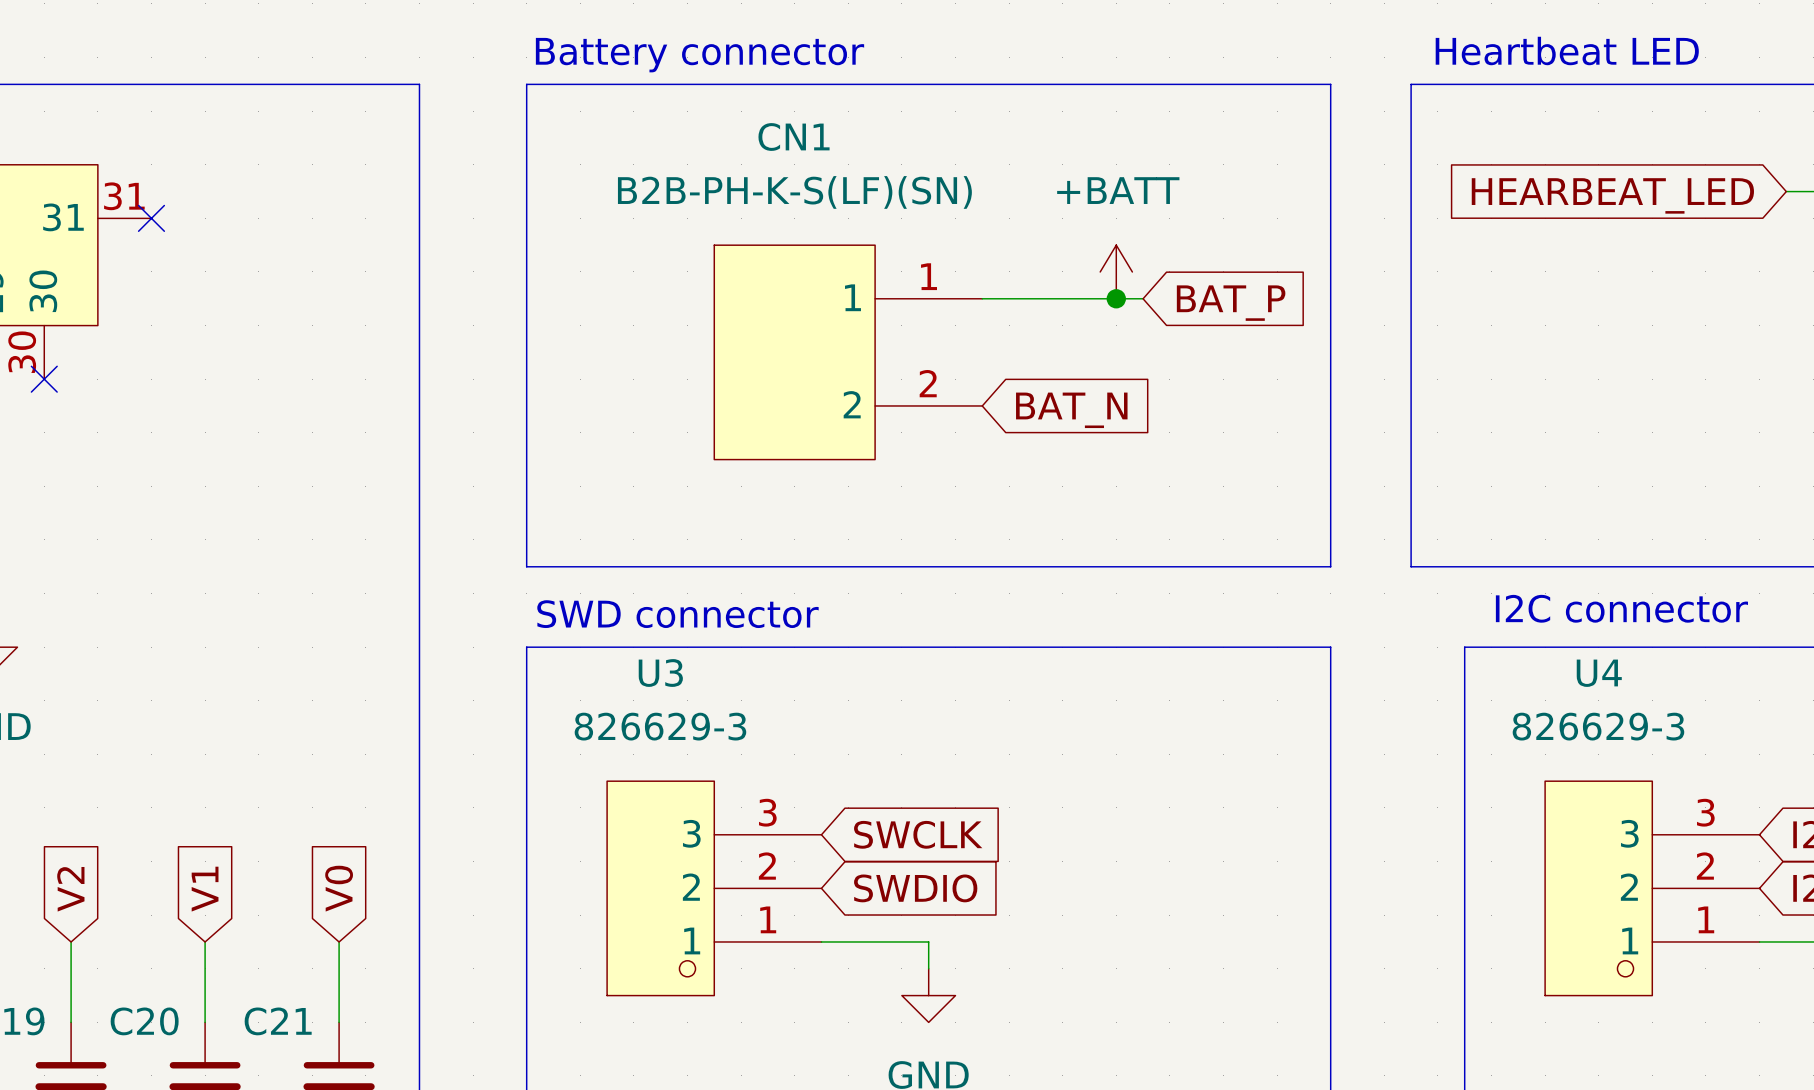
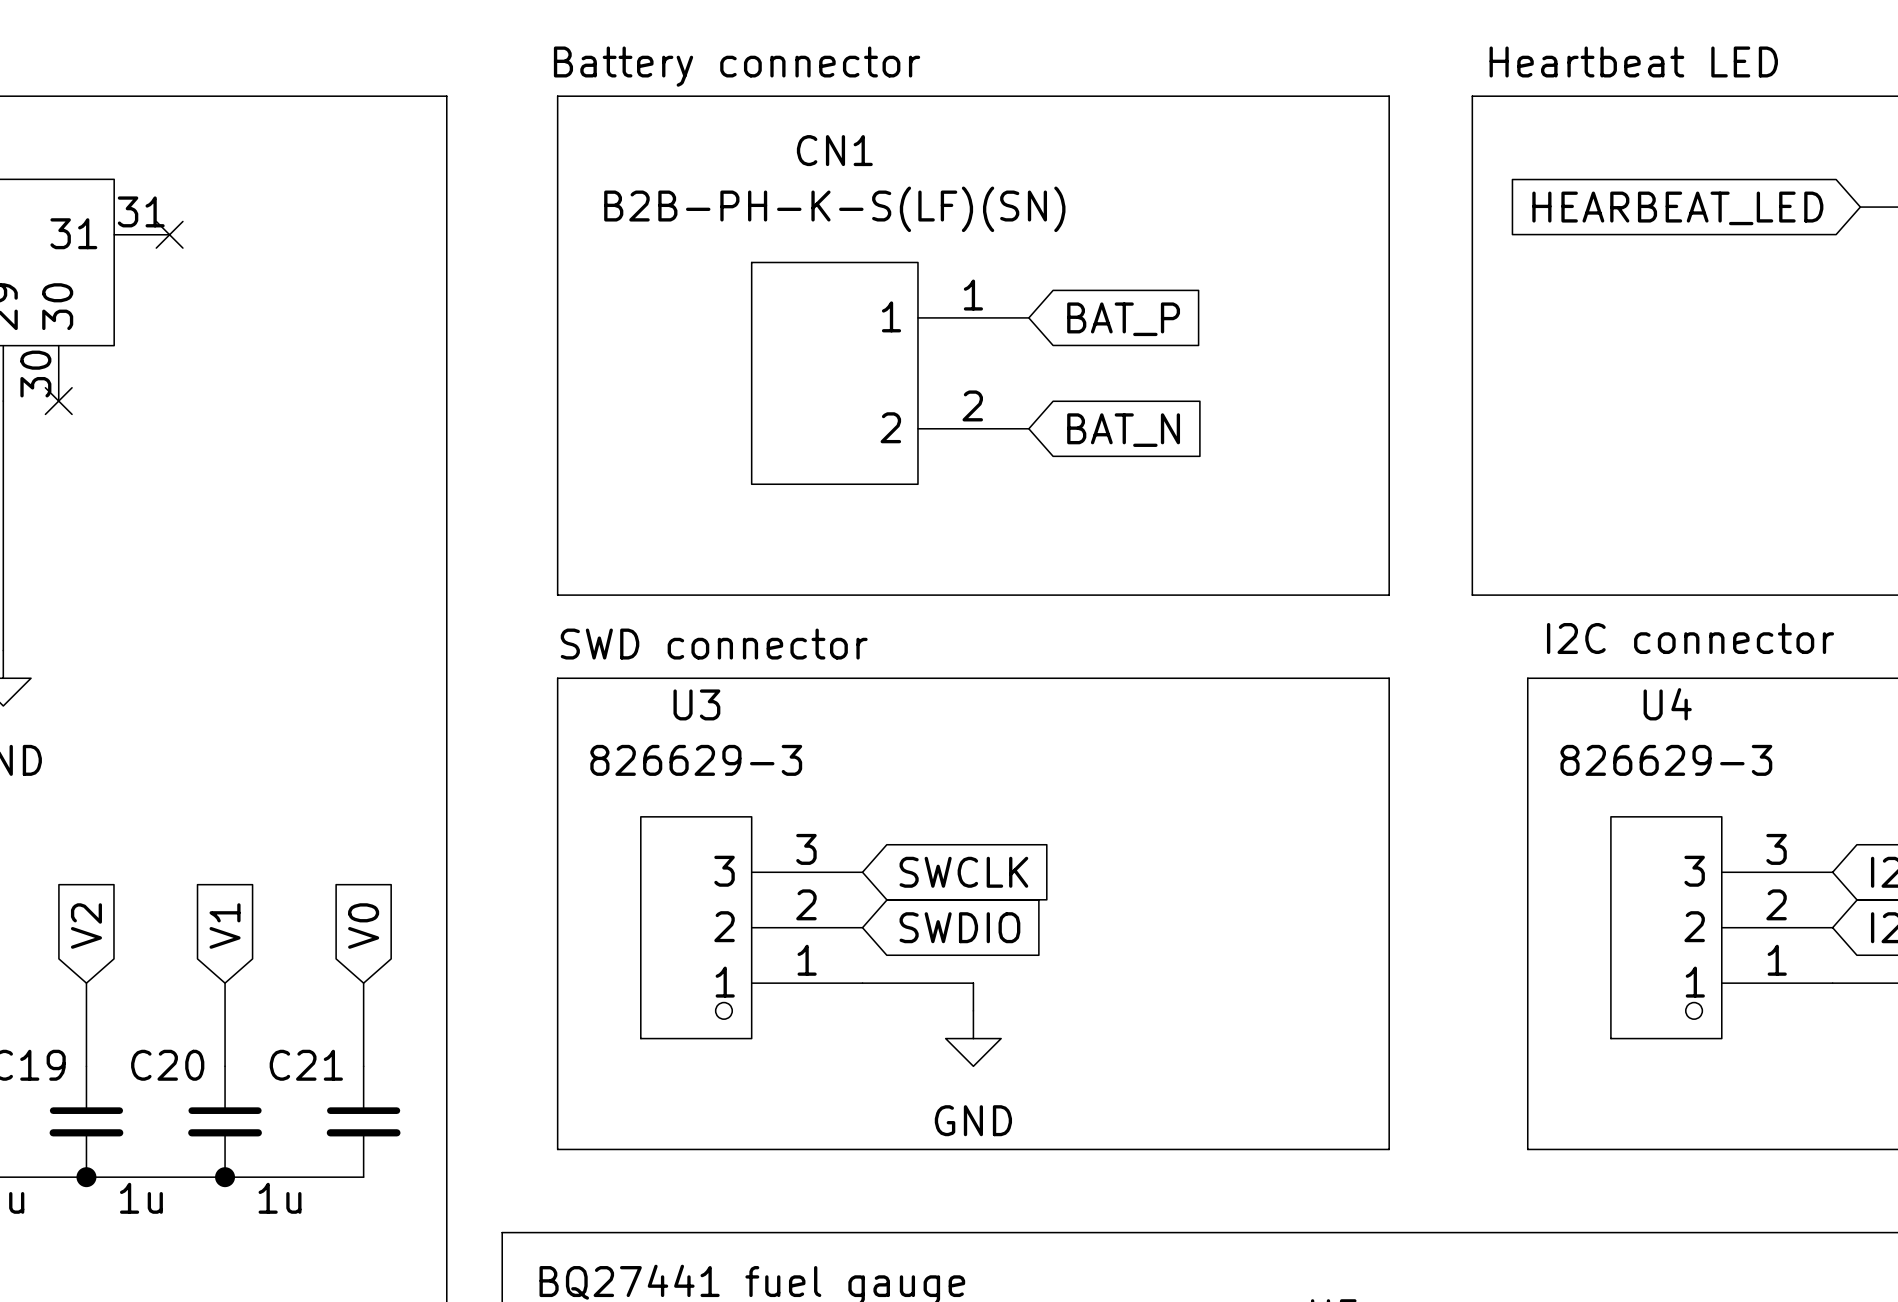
power symbol: +BATT (1116, 271) -> none
wire: (982, 298) (1143, 298) -> none
junction: (1116, 298) -> none
global label position: BAT_P (1231, 303) -> BAT_P (1123, 319)

